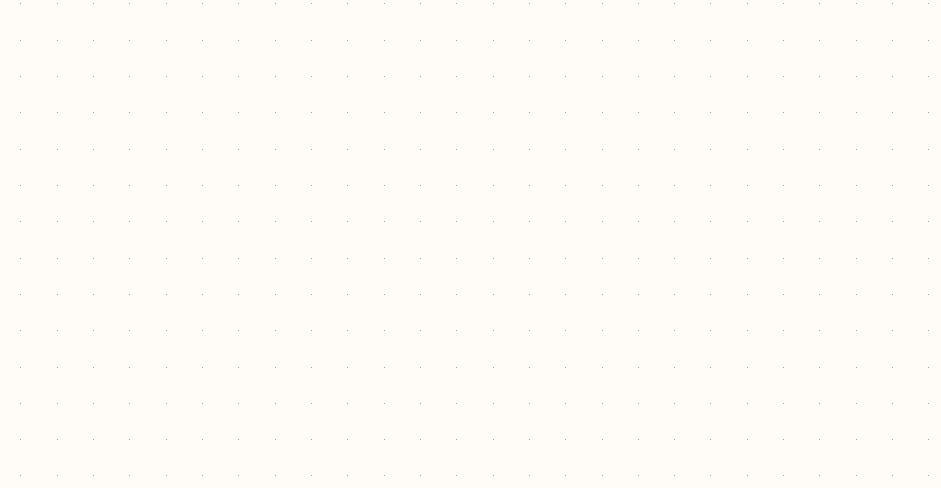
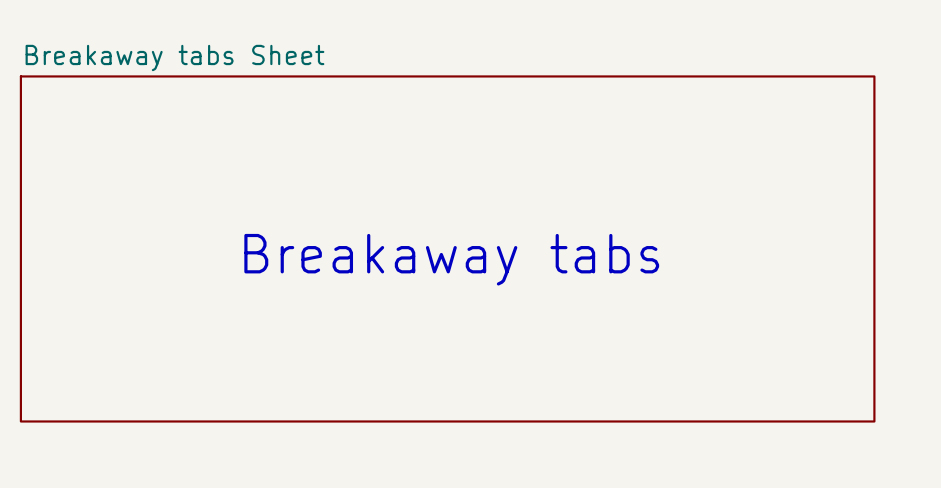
sheet Breakaway tabs Sheet: none -> (447, 248)
text: none -> Breakaway tabs (451, 259)

